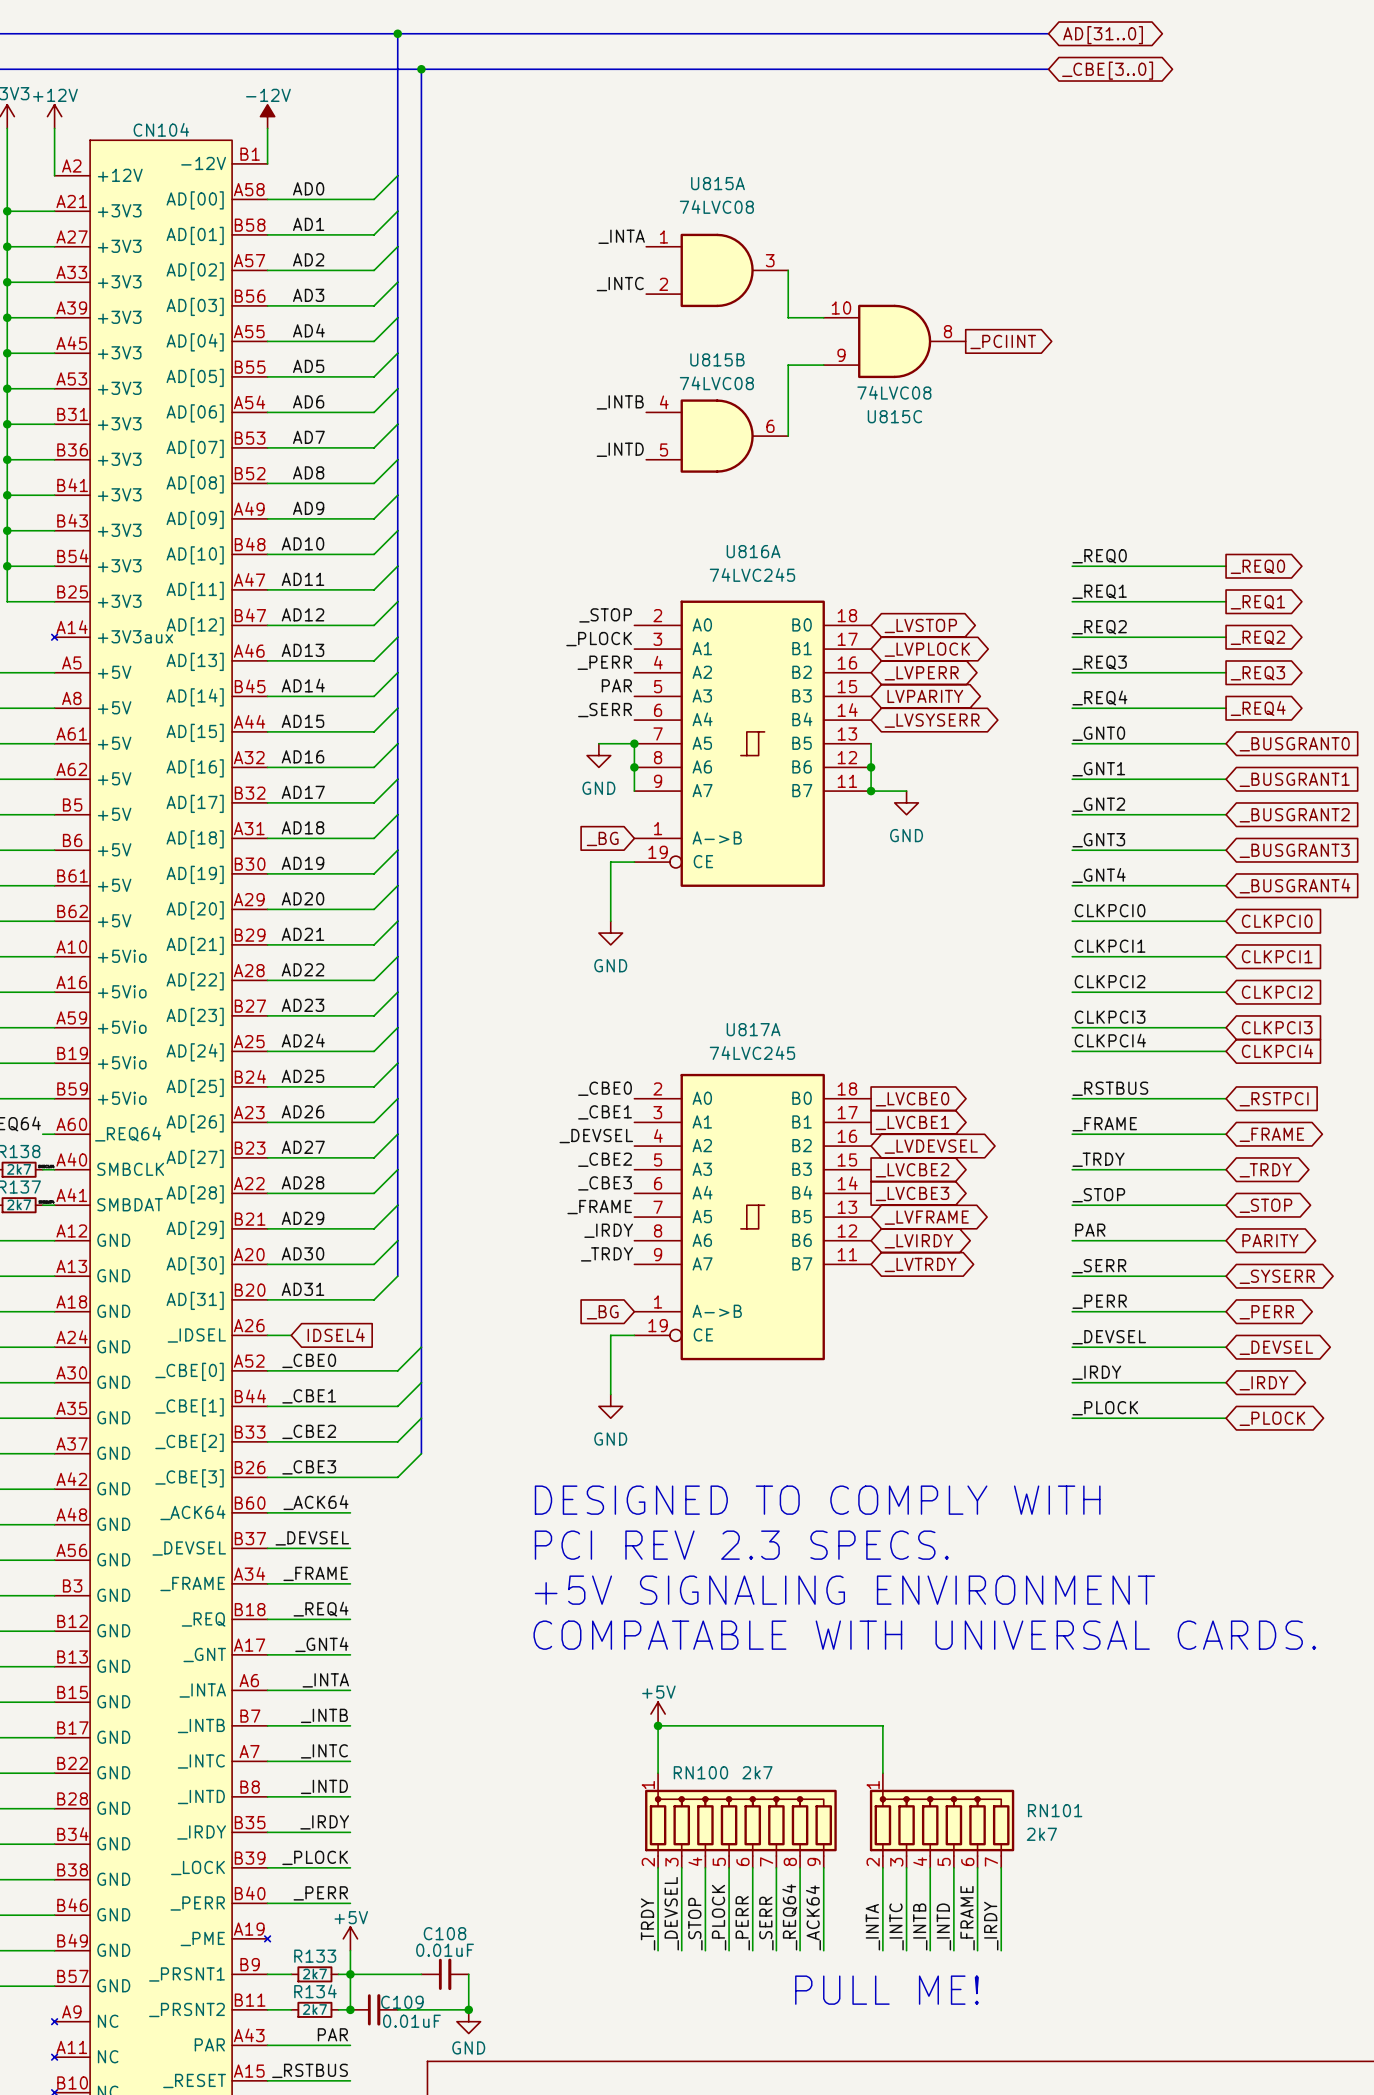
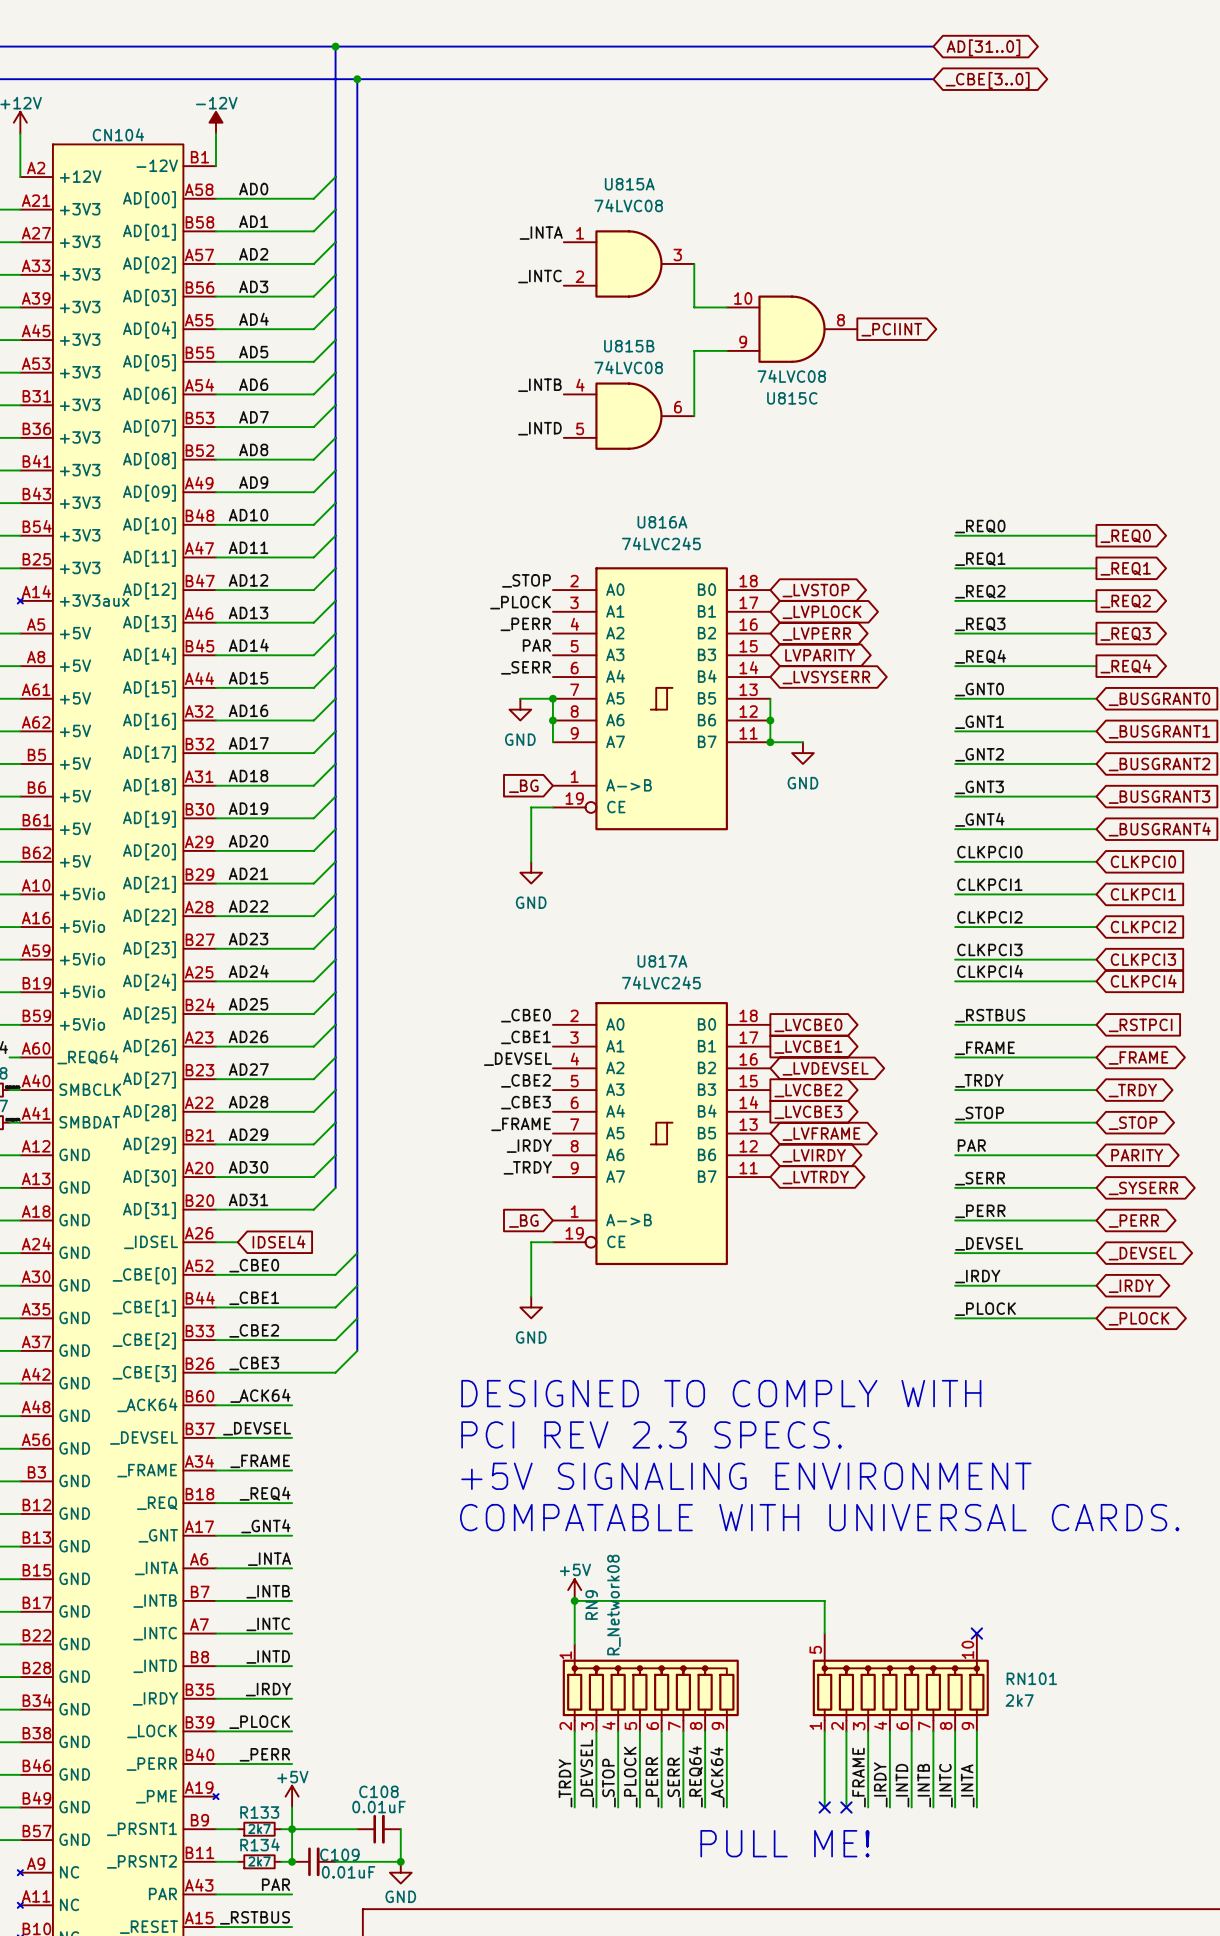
wire: (882, 1725) (882, 1773) -> (781, 1600) (824, 1600) (824, 1633)
no-connect mark: none -> (976, 1633)
RN100 name: RN100 (700, 1772) -> RN9 (591, 1605)
RN100 value: 2k7 (757, 1772) -> R_Network08 (613, 1605)
RN101 symbol: [869, 1773, 1015, 1868] -> [812, 1633, 989, 1732]
RN101 name position: RN101 (1055, 1810) -> RN101 (1031, 1678)
RN101 value position: 2k7 (1041, 1834) -> 2k7 (1019, 1700)
wire: (882, 1867) (882, 1950) -> (911, 1731) (911, 1807)
wire: (906, 1867) (906, 1950) -> (933, 1731) (933, 1807)
wire: none -> (955, 1731) (955, 1807)
wire: none -> (976, 1731) (976, 1807)
label position: _INTC (896, 1926) -> _INTC (945, 1785)
label position: _INTB (920, 1926) -> _INTB (924, 1785)
label position: _INTD (943, 1926) -> _INTD (902, 1785)
label position: _INTA (872, 1927) -> _INTA (967, 1785)
no-connect mark: none -> (824, 1807)
no-connect mark: none -> (846, 1807)

